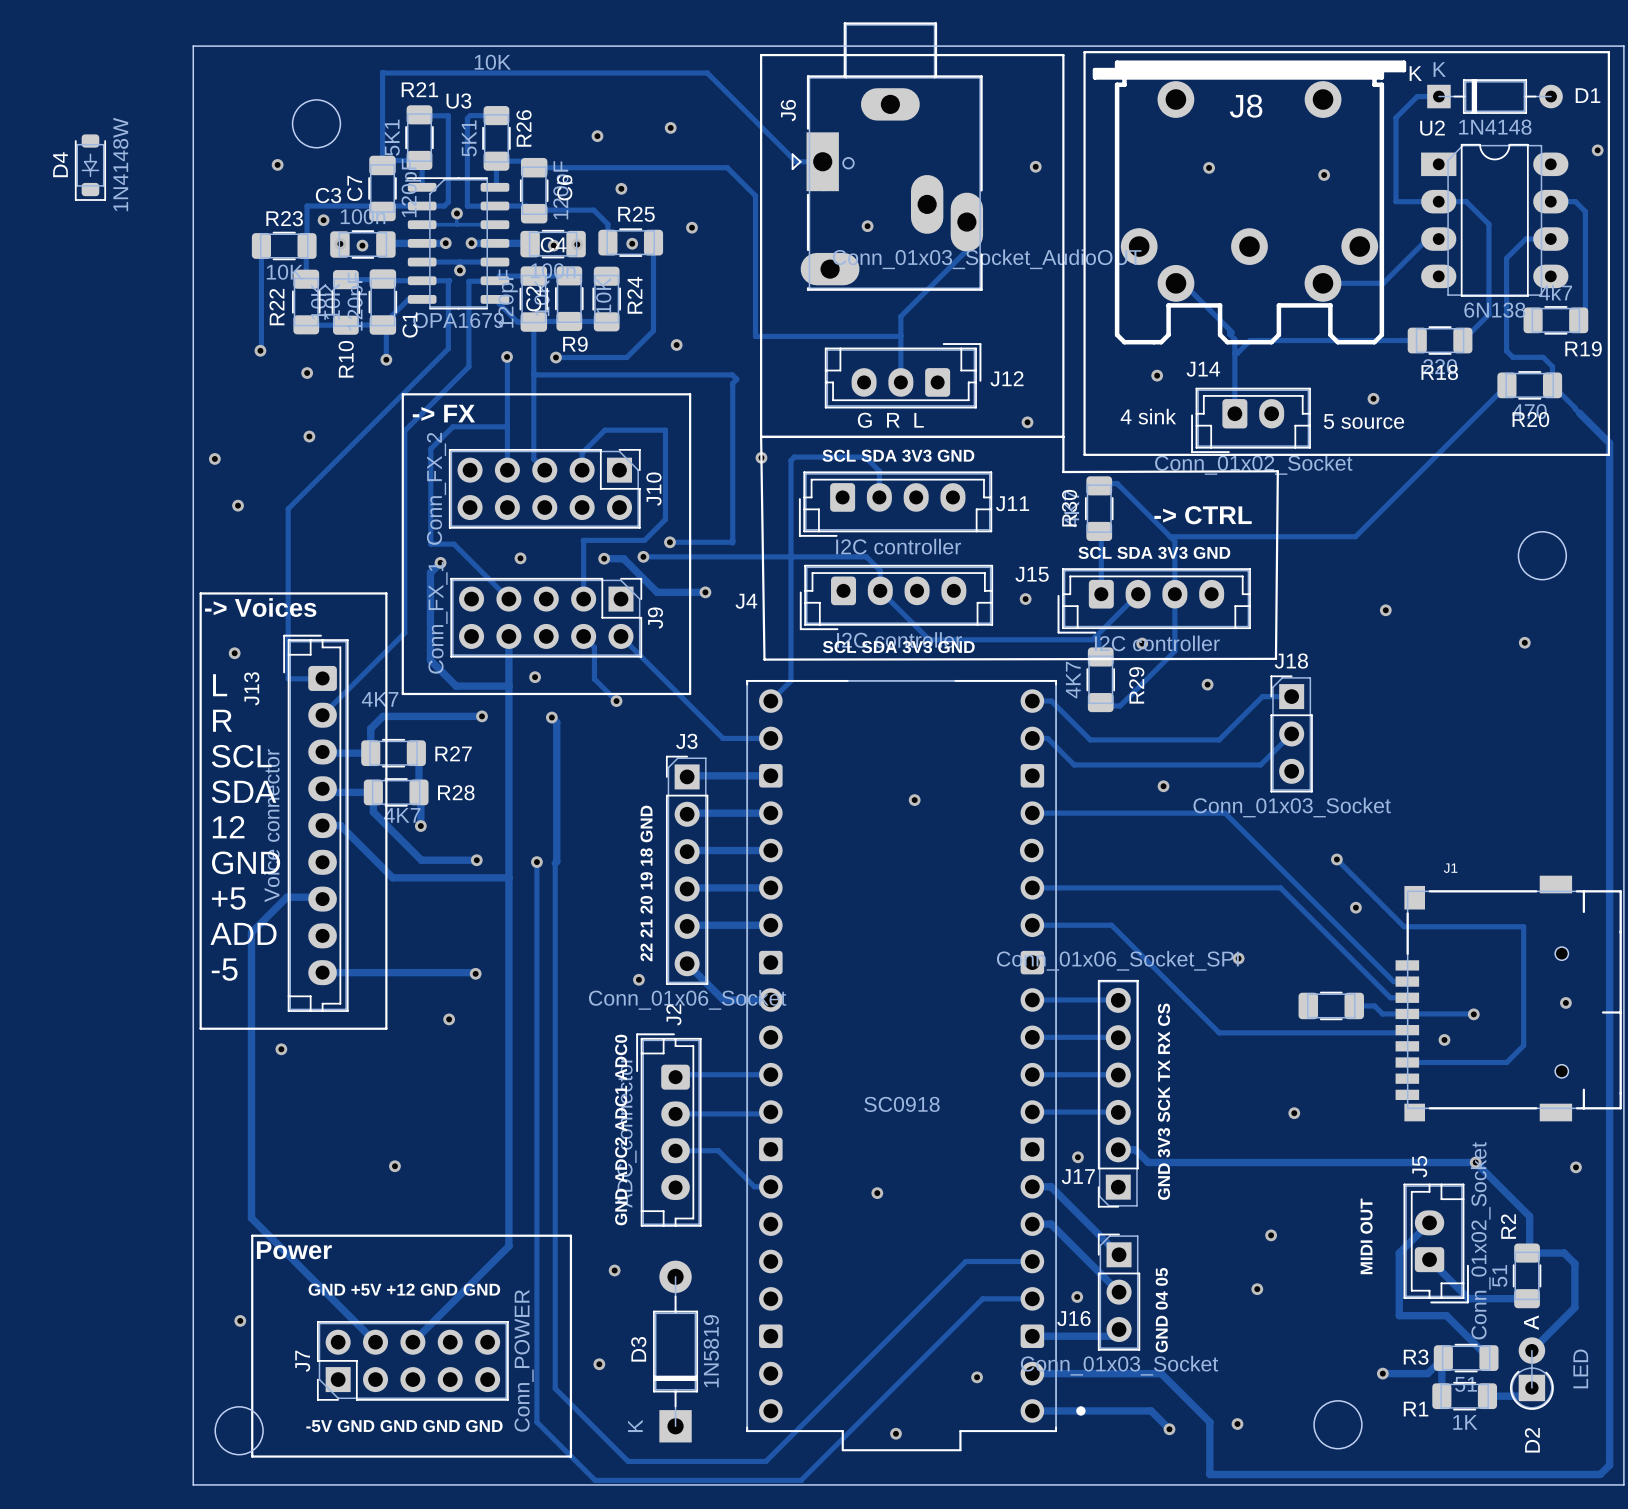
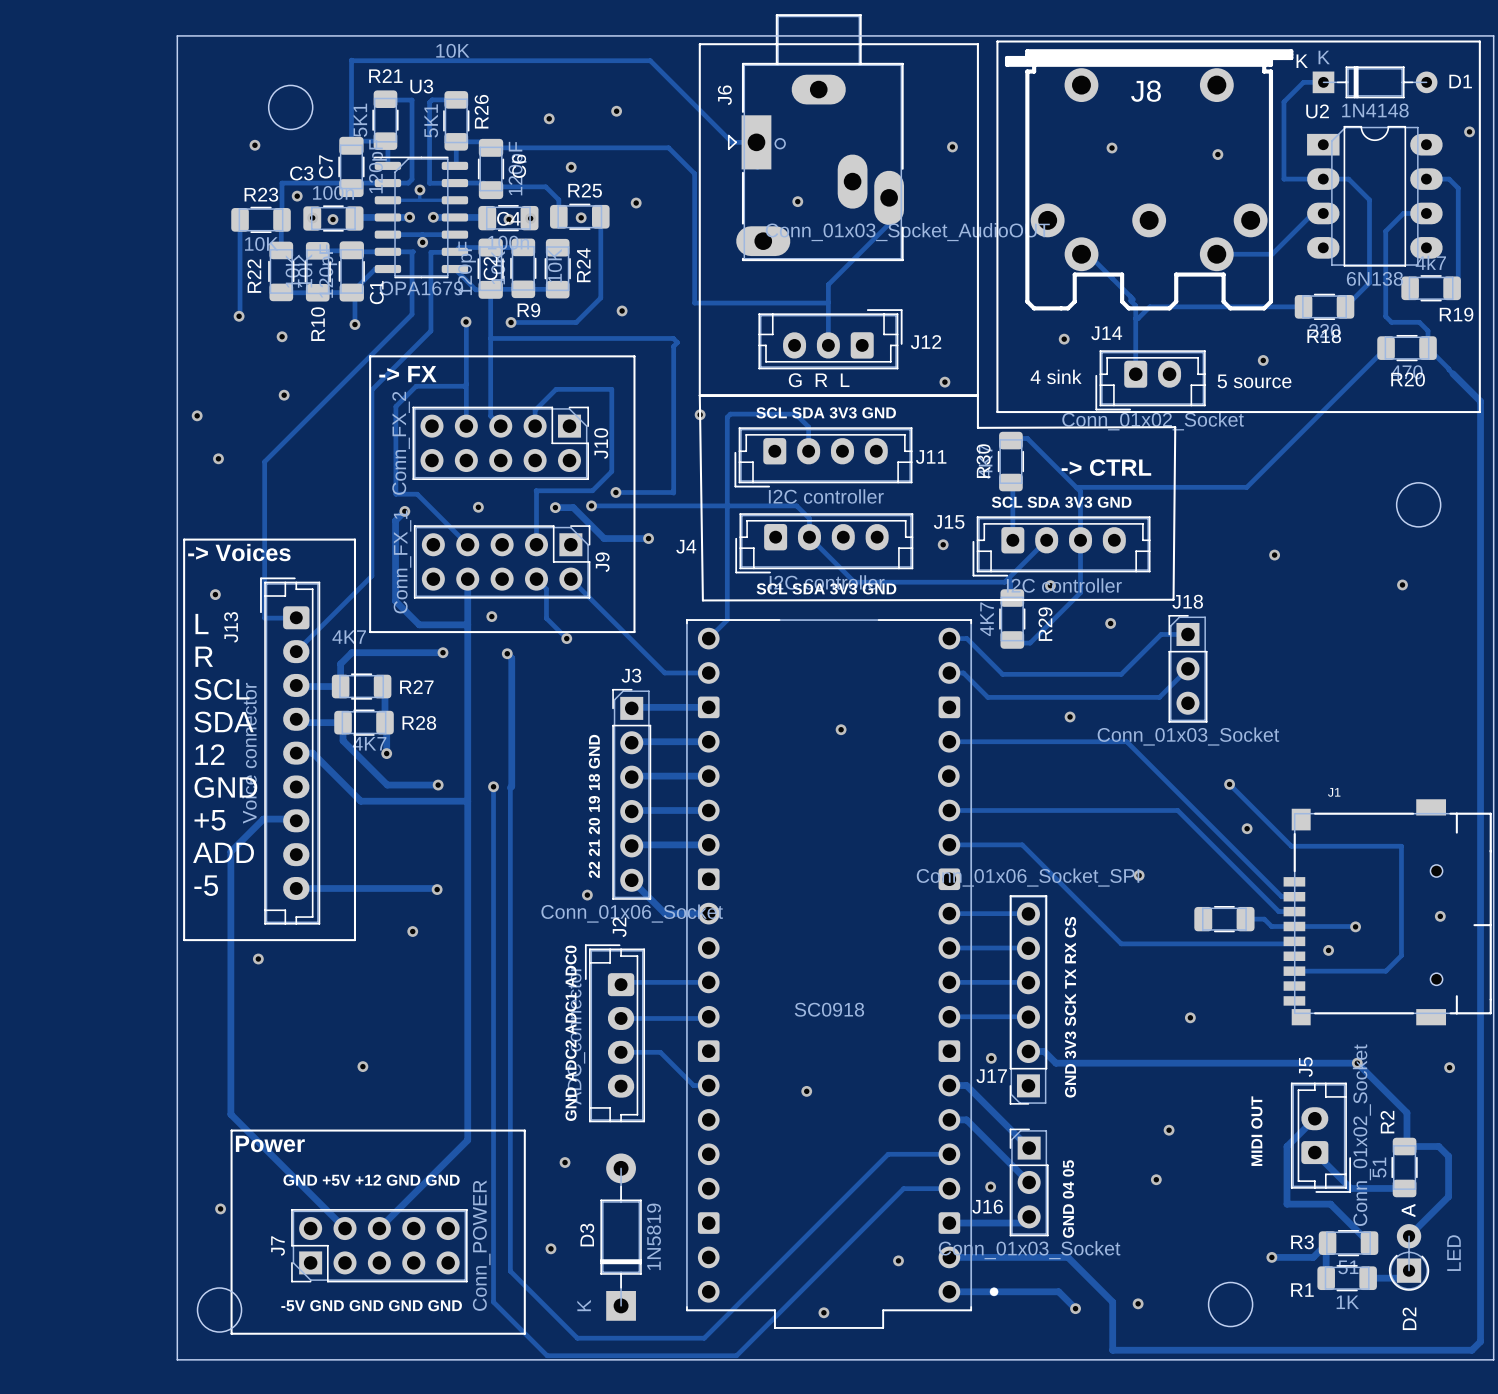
D4: 1N4148W (90, 167) -> none

